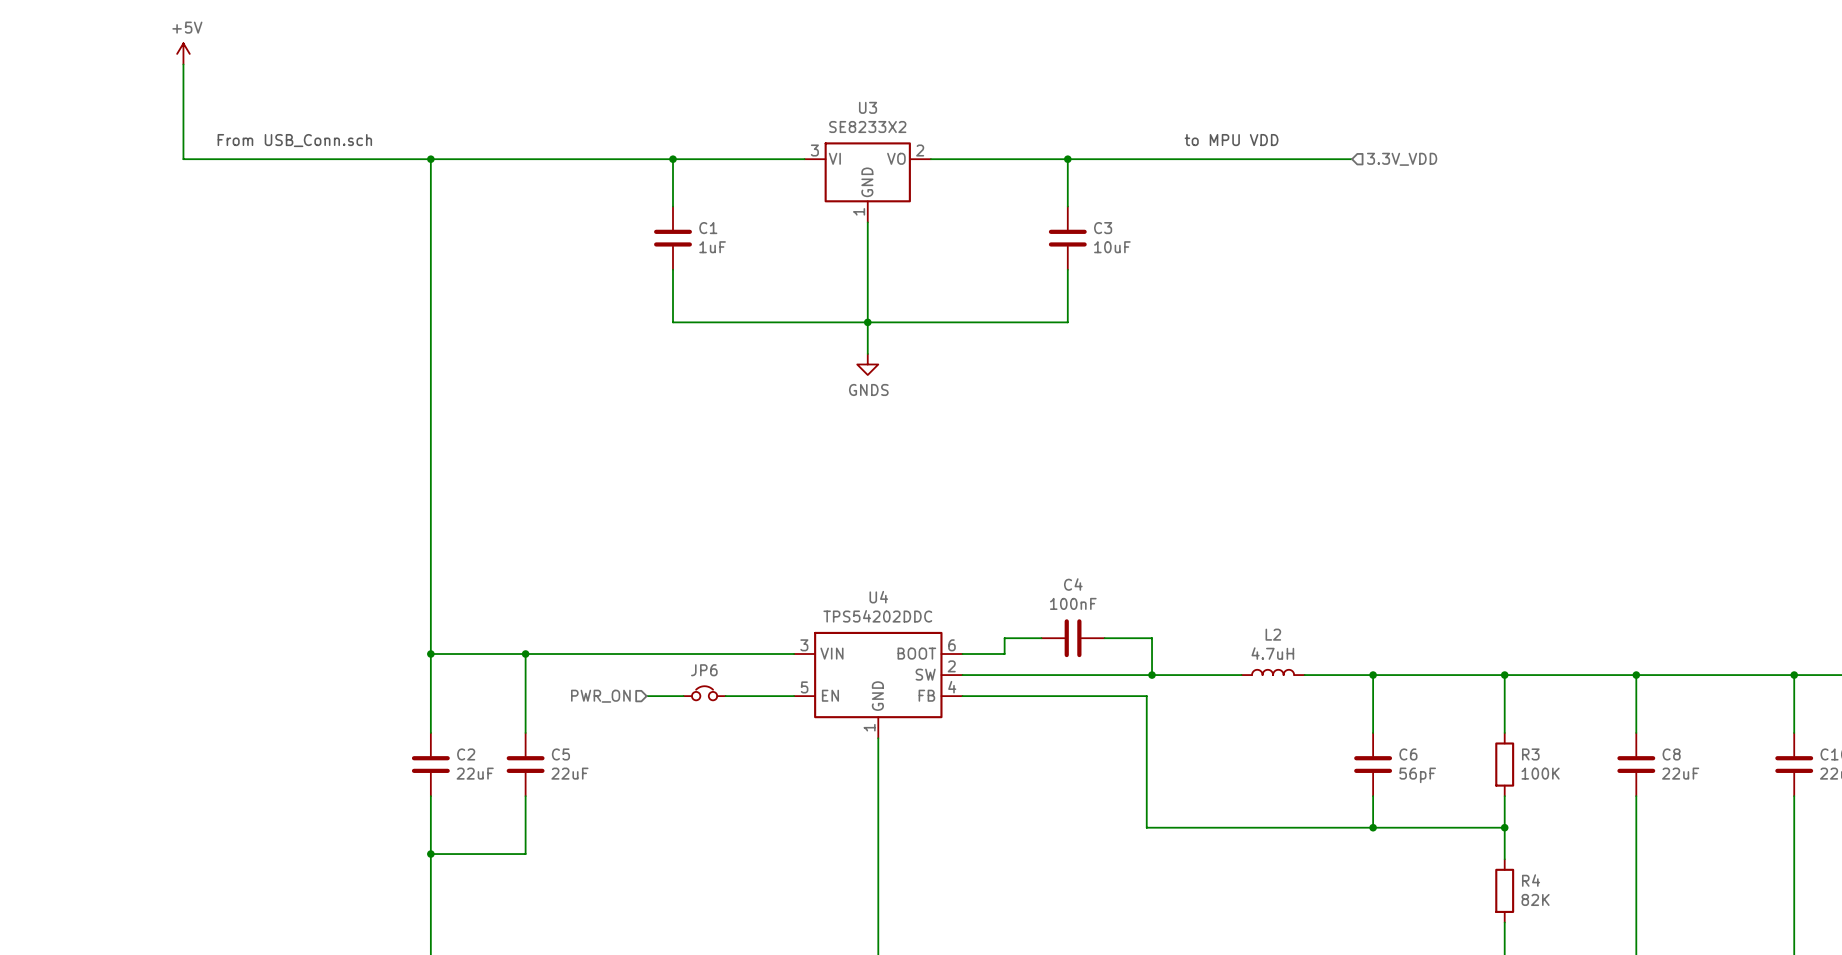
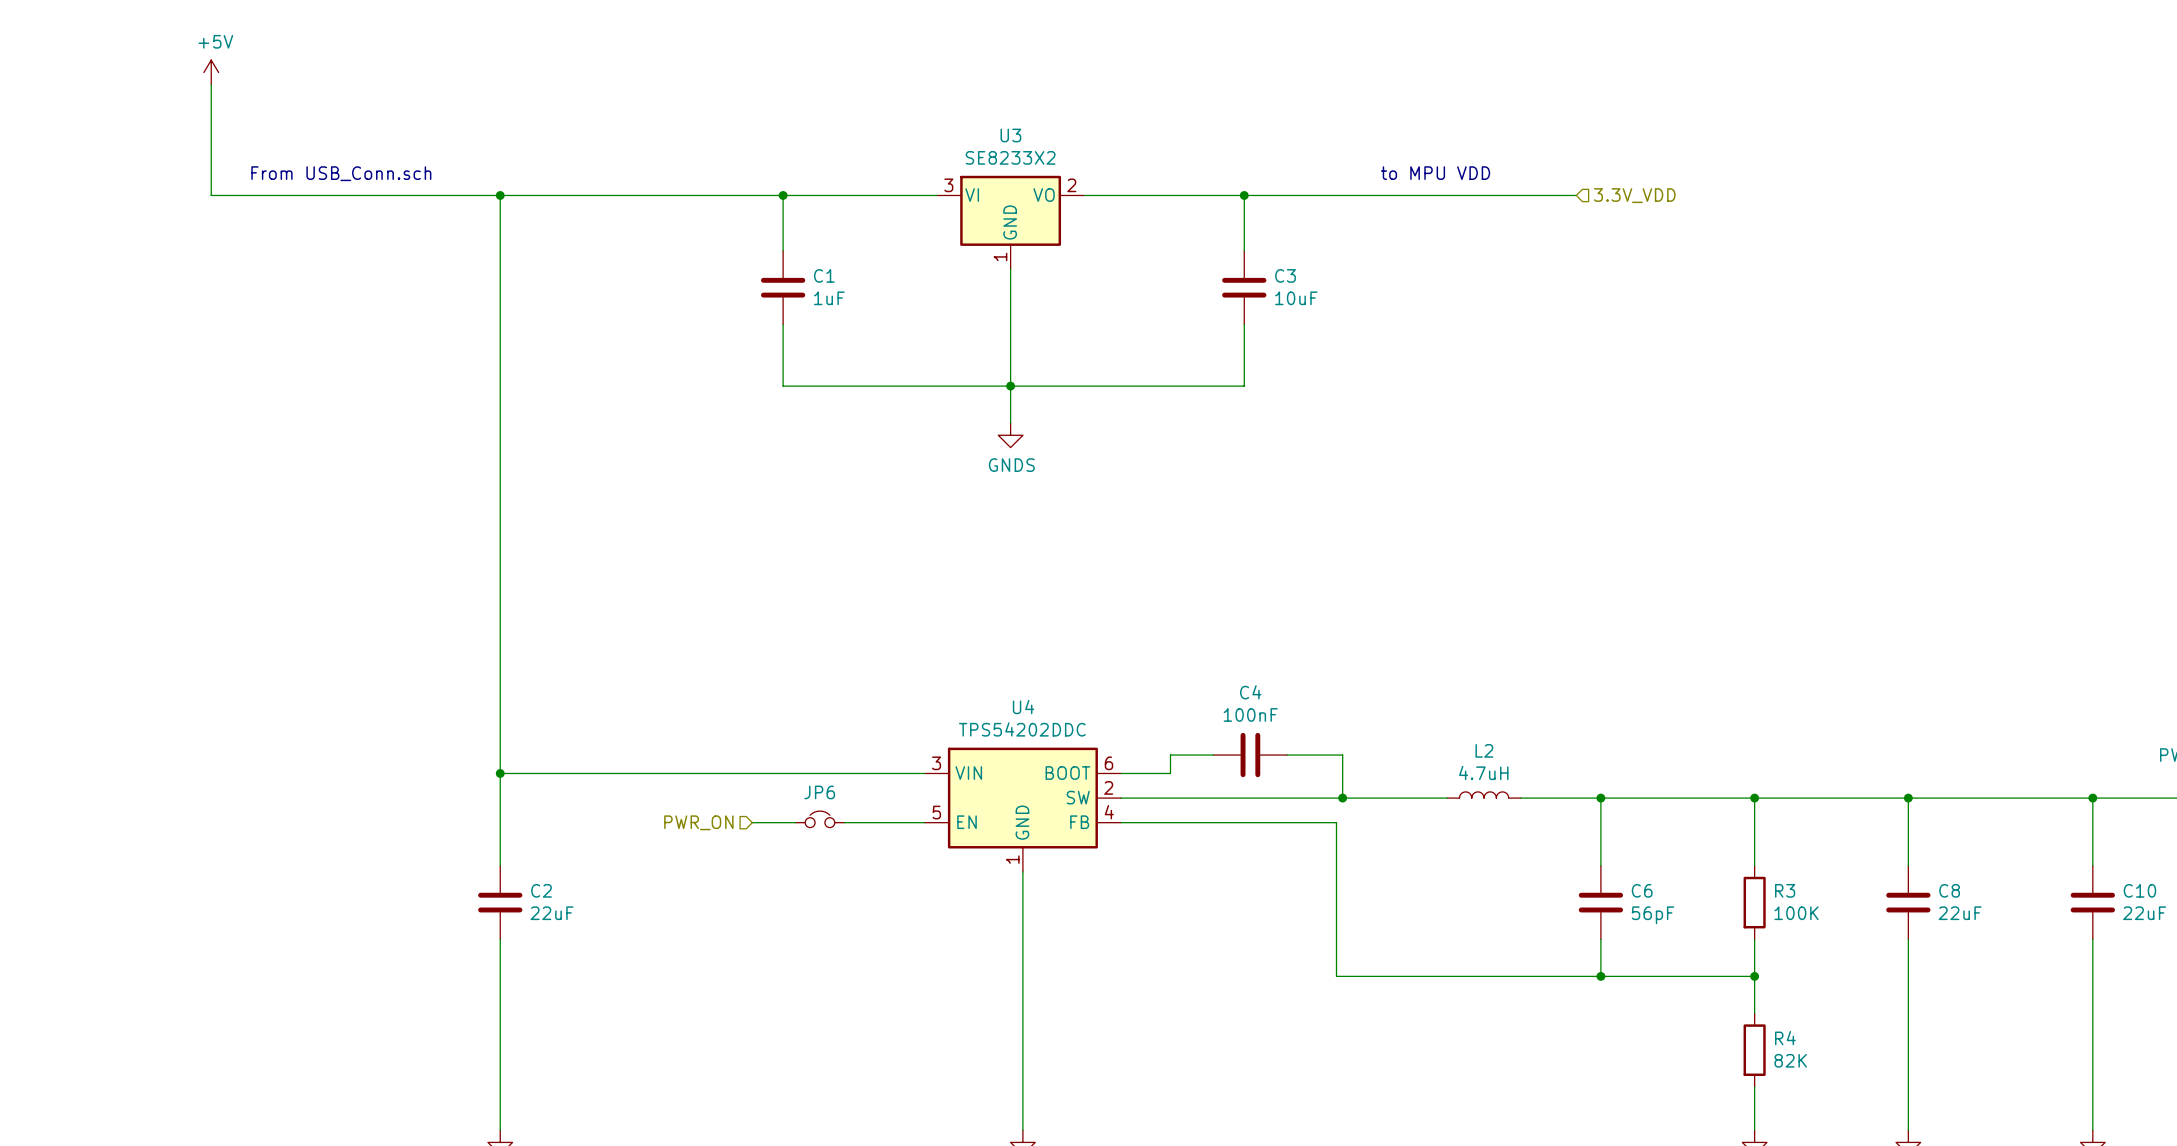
wire: (525, 654) (525, 732) -> none
junction: (525, 654) -> none
C5: 22uF (525, 764) -> none
wire: (525, 796) (525, 854) (430, 854) -> none
junction: (430, 854) -> none

